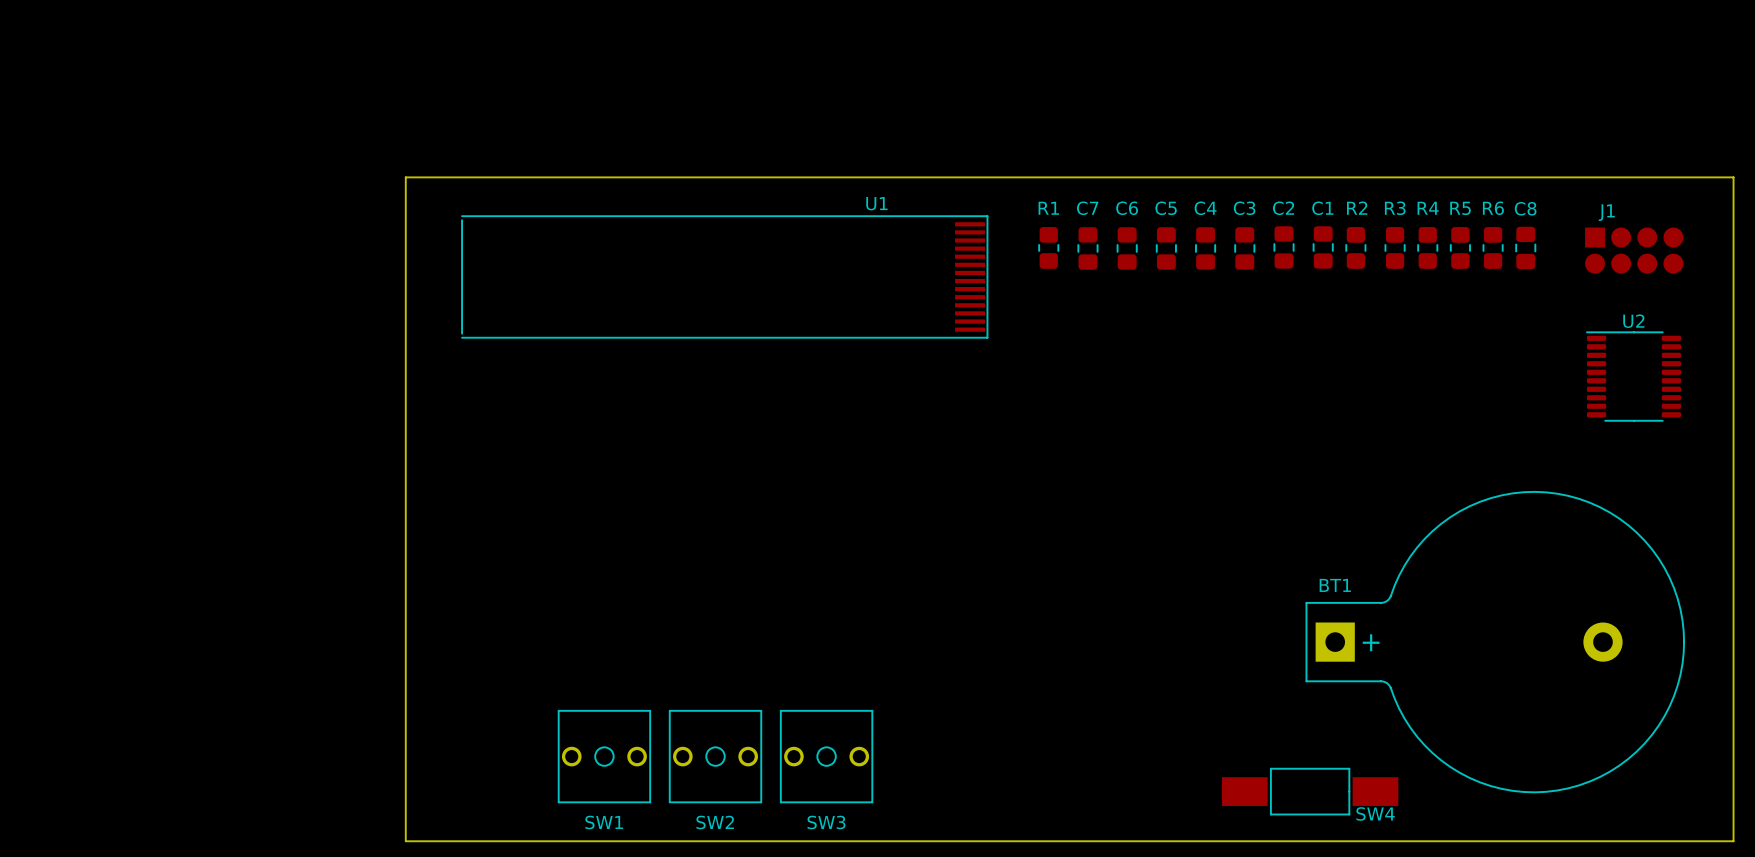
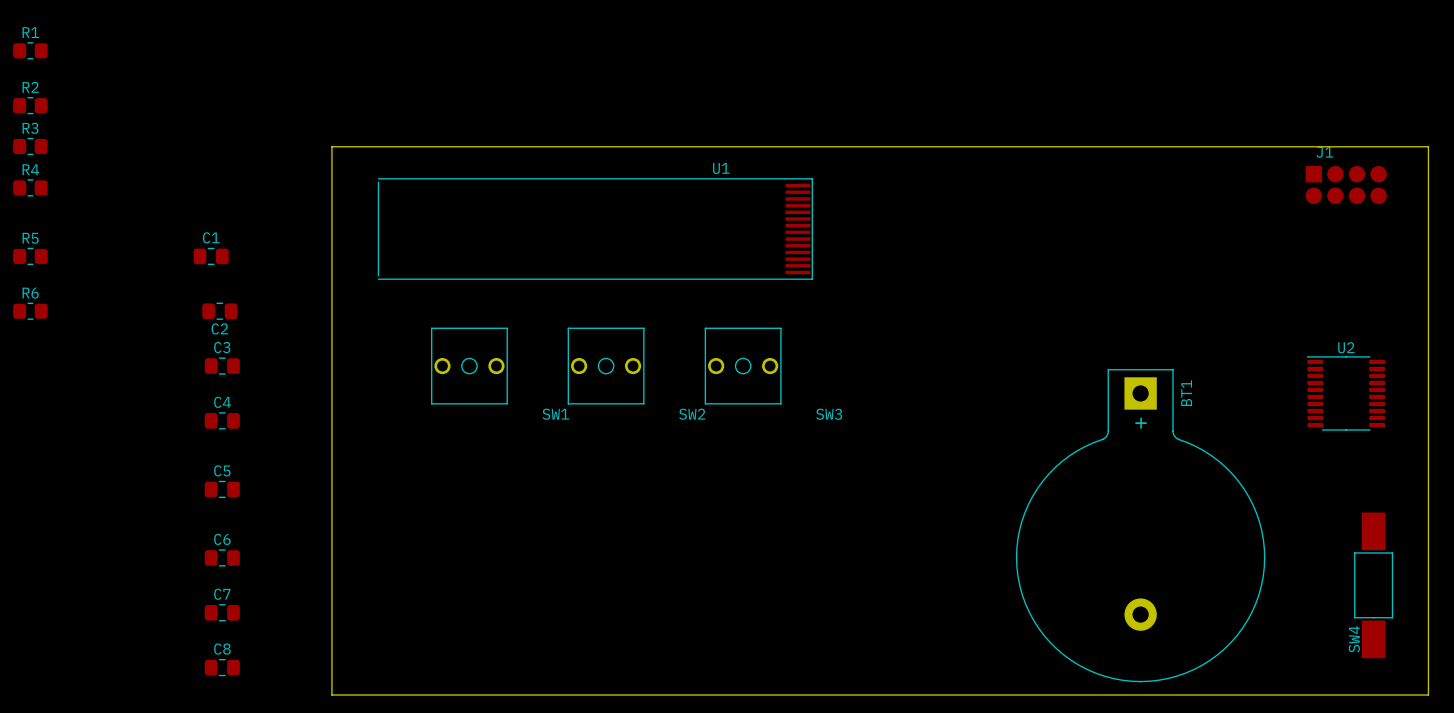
C2 name position: C2 (1283, 208) -> C2 (219, 328)
R1 rotation: 0° (1048, 247) -> 90° clockwise (30, 50)
R1 position: (1048, 247) -> (30, 50)
C2 rotation: 0° (1283, 247) -> 90° clockwise (219, 311)
C2 position: (1283, 247) -> (219, 311)
C1 rotation: 0° (1323, 247) -> 90° clockwise (211, 256)
C1 position: (1323, 247) -> (211, 256)
R2 rotation: 0° (1355, 247) -> 90° clockwise (30, 105)
R2 position: (1355, 247) -> (30, 105)
R3 rotation: 0° (1395, 247) -> 90° clockwise (30, 146)
R3 position: (1395, 247) -> (30, 146)
R4 rotation: 0° (1427, 247) -> 90° clockwise (30, 187)
R4 position: (1427, 247) -> (30, 187)
R5 rotation: 0° (1460, 247) -> 90° clockwise (30, 256)
R5 position: (1460, 247) -> (30, 256)
R6 rotation: 0° (1493, 247) -> 90° clockwise (30, 311)
R6 position: (1493, 247) -> (30, 311)
C8 rotation: 0° (1525, 247) -> 90° clockwise (222, 667)
C8 position: (1525, 247) -> (222, 667)
C7 rotation: 0° (1087, 248) -> 90° clockwise (222, 612)
C7 position: (1087, 248) -> (222, 612)
C6 rotation: 0° (1127, 248) -> 90° clockwise (222, 557)
C6 position: (1127, 248) -> (222, 557)
C5 rotation: 0° (1166, 248) -> 90° clockwise (222, 489)
C5 position: (1166, 248) -> (222, 489)
C4 rotation: 0° (1205, 248) -> 90° clockwise (222, 420)
C4 position: (1205, 248) -> (222, 420)
C3 rotation: 0° (1244, 248) -> 90° clockwise (222, 366)
C3 position: (1244, 248) -> (222, 366)
J1 position: (1634, 250) -> (1346, 184)
U2 position: (1633, 376) -> (1345, 393)
BT1 rotation: 0° (1495, 642) -> 90° clockwise (1140, 525)
SW1 position: (604, 756) -> (469, 366)
SW2 position: (715, 756) -> (606, 366)
SW3 position: (826, 756) -> (743, 366)
SW4 rotation: 0° (1310, 791) -> 90° clockwise (1373, 585)
SW4 position: (1310, 791) -> (1373, 585)
SW1 name position: SW1 (604, 822) -> SW1 (555, 414)
SW2 name position: SW2 (715, 822) -> SW2 (692, 414)
SW3 name position: SW3 (826, 822) -> SW3 (829, 414)

